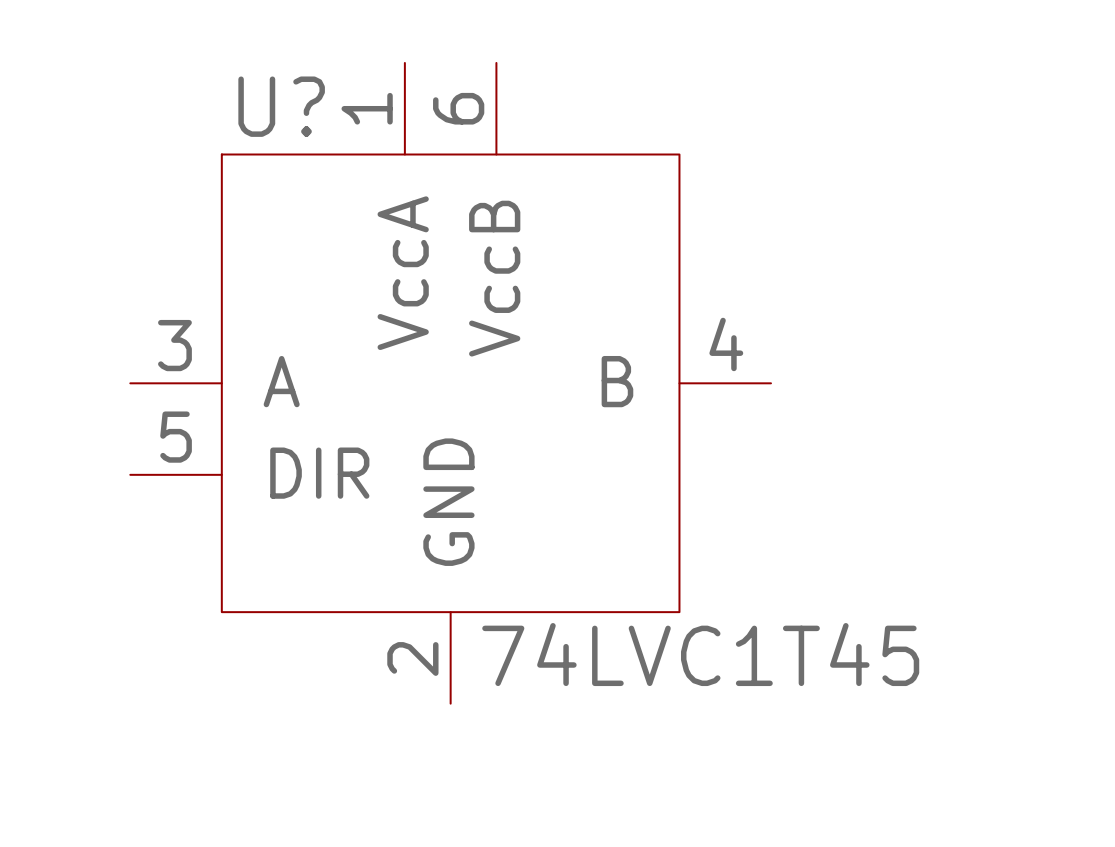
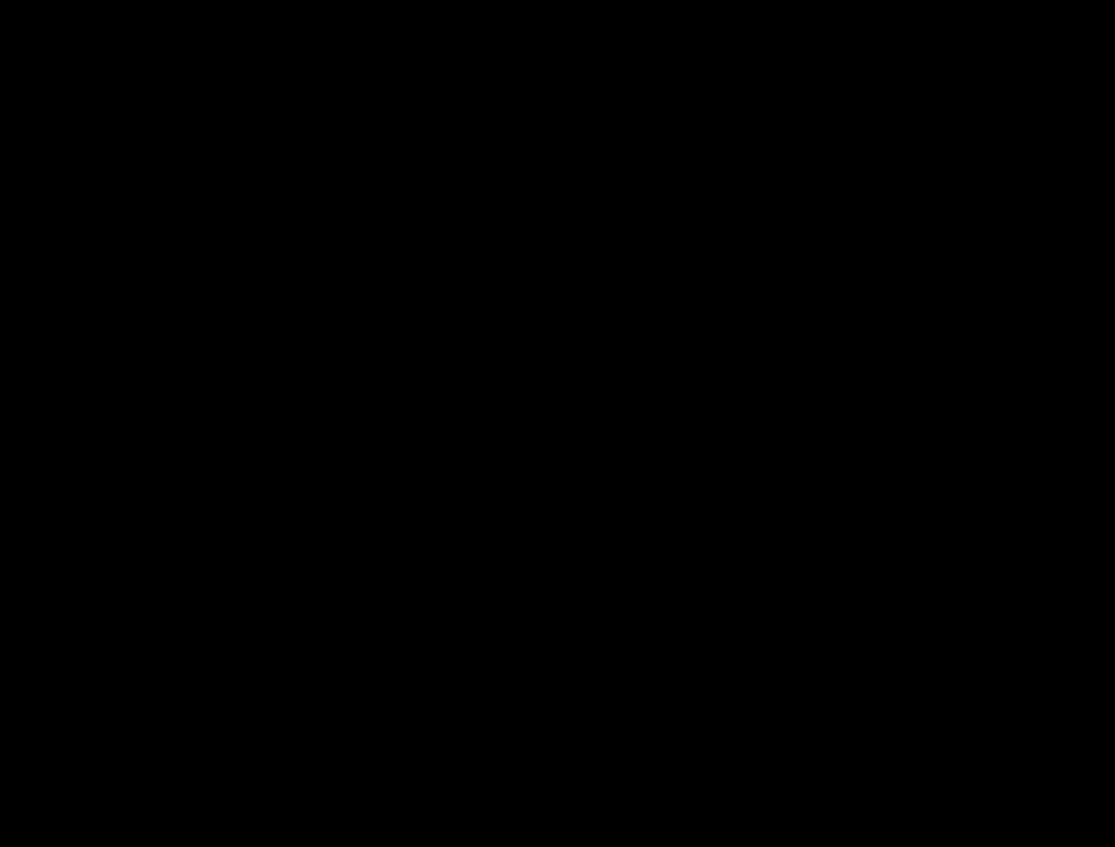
U?: 74LVC1T45 (450, 383) -> none

